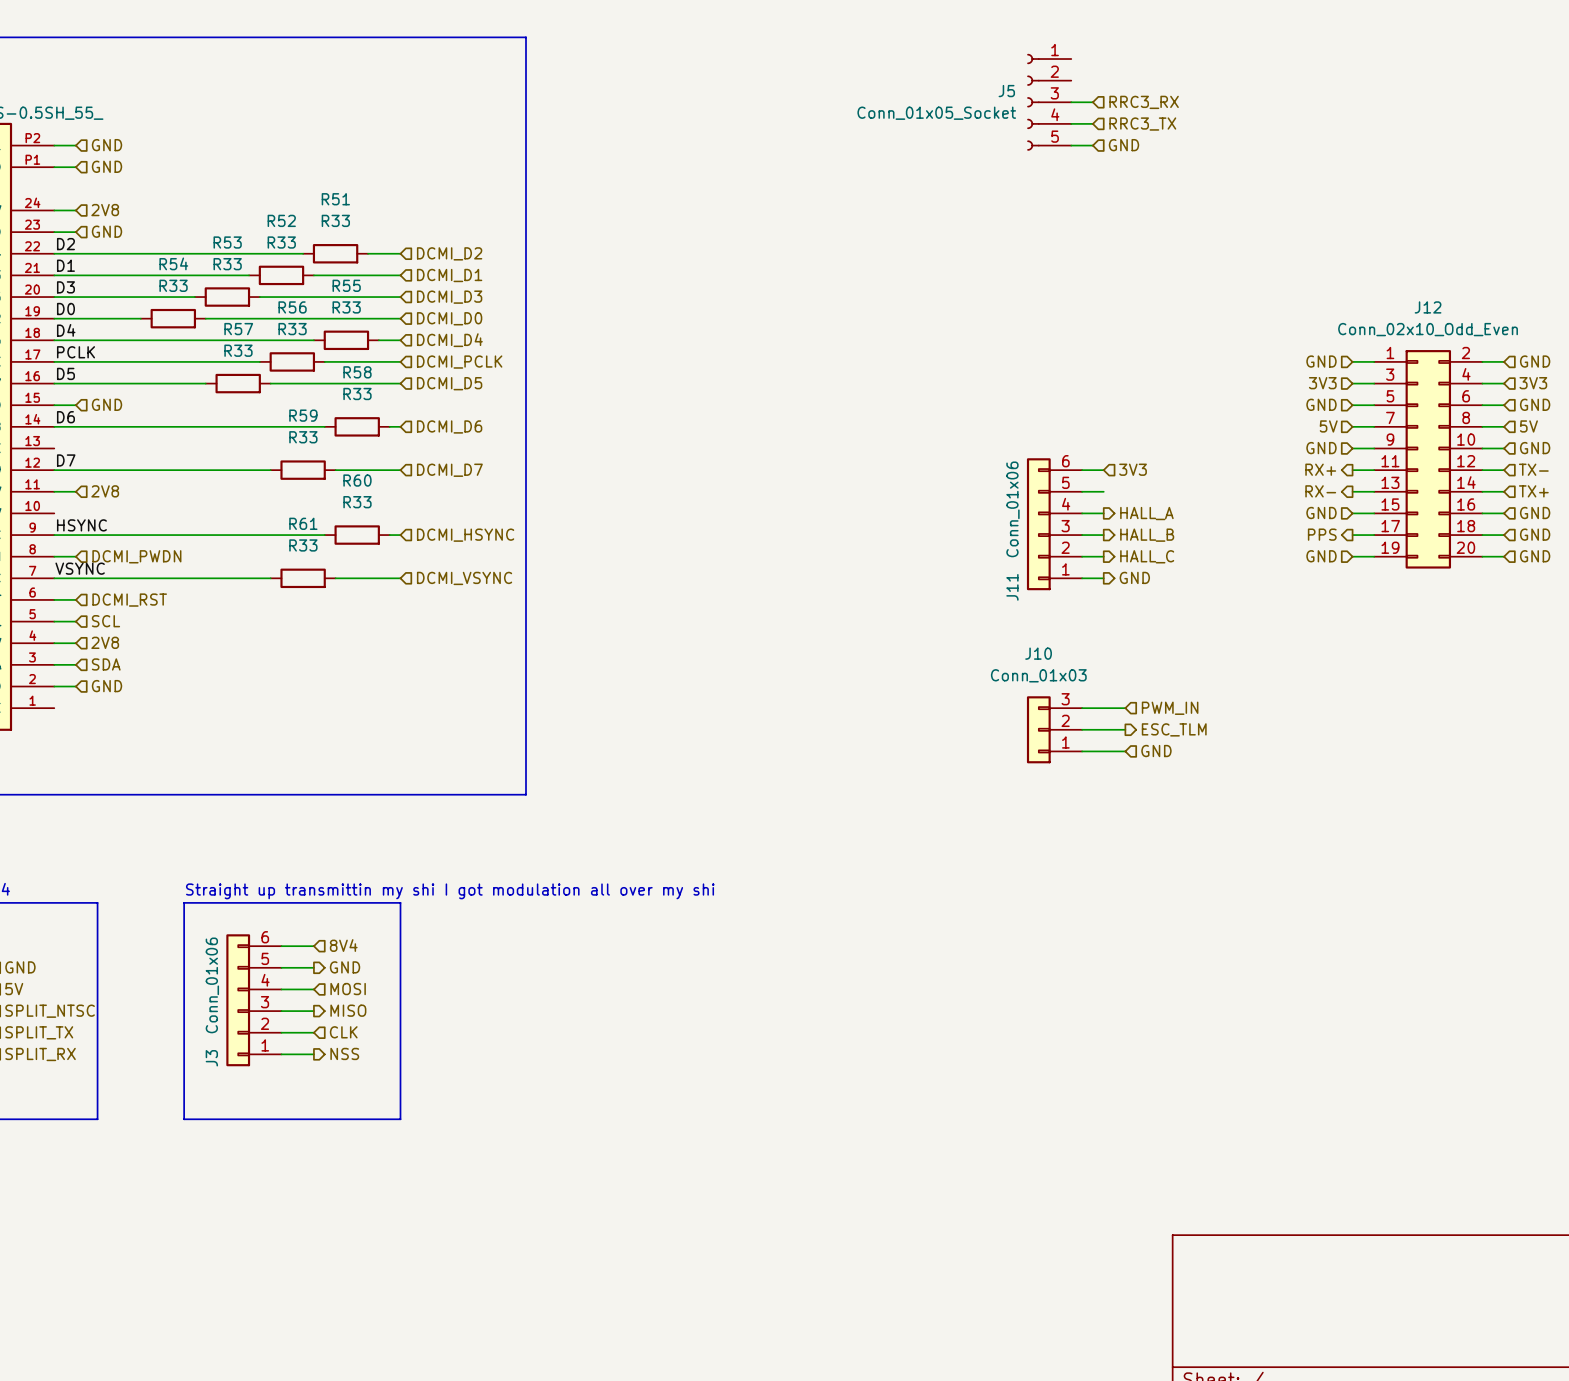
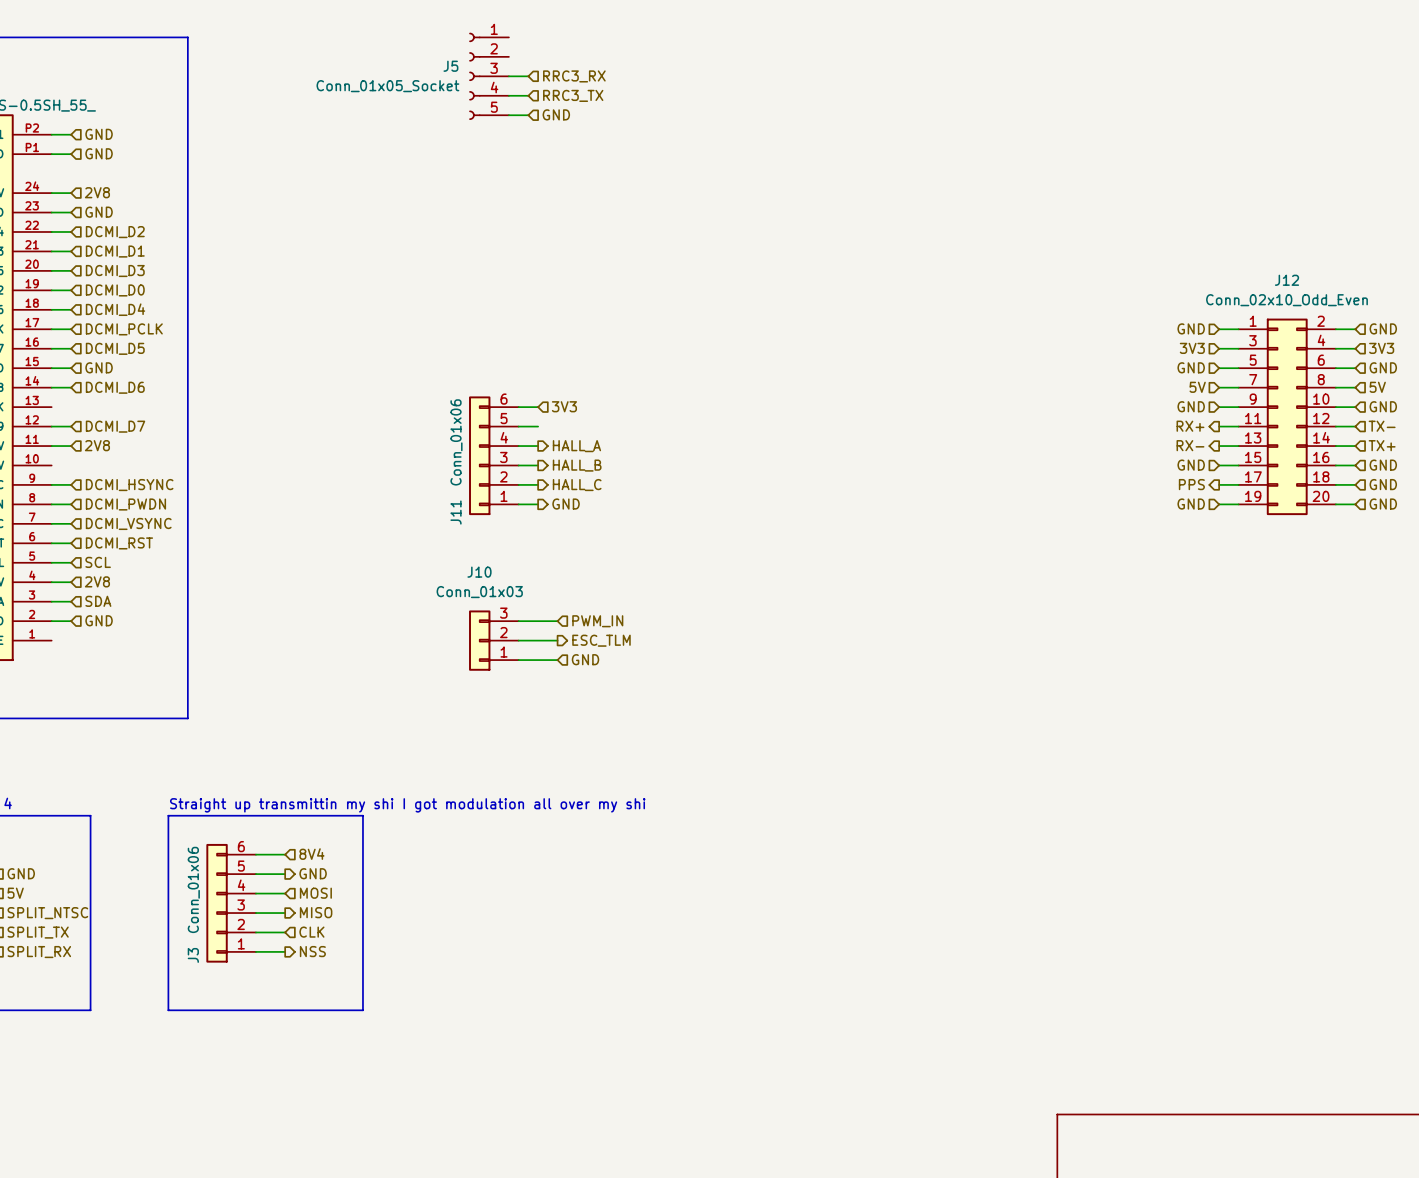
line: (205, 37) (526, 37) (526, 794) (205, 794) -> (187, 37) (187, 718)
wire: none -> (508, 76) (528, 76)
hierarchical label: none -> RRC3_RX (574, 76)
wire: none -> (508, 95) (528, 95)
hierarchical label: none -> RRC3_TX (573, 95)
J5 position: (1049, 102) -> (489, 76)
wire: (1071, 102) (1092, 102) -> none
hierarchical label: RRC3_RX (1144, 102) -> none
wire: none -> (508, 115) (528, 115)
hierarchical label: none -> GND (556, 114)
wire: (1071, 123) (1092, 123) -> none
hierarchical label: RRC3_TX (1142, 124) -> none
wire: (1071, 145) (1092, 145) -> none
hierarchical label: GND (1124, 145) -> none
label: D2 (65, 244) -> none
wire: (75, 253) (303, 253) -> none
hierarchical label: none -> DCMI_D2 (115, 232)
R51: R33 (335, 253) -> none
wire: (368, 253) (400, 253) -> none
hierarchical label: DCMI_D2 (449, 253) -> none
label: D1 (65, 265) -> none
wire: (75, 275) (249, 275) -> none
hierarchical label: none -> DCMI_D1 (115, 251)
R52: R33 (281, 275) -> none
wire: (313, 275) (400, 275) -> none
hierarchical label: DCMI_D1 (449, 275) -> none
label: D3 (65, 287) -> none
wire: (75, 297) (194, 297) -> none
hierarchical label: none -> DCMI_D3 (115, 271)
R53: R33 (227, 297) -> none
wire: (259, 297) (400, 297) -> none
hierarchical label: DCMI_D3 (449, 297) -> none
label: D0 (65, 309) -> none
wire: (75, 318) (140, 318) -> none
hierarchical label: none -> DCMI_D0 (115, 290)
R54: R33 (173, 318) -> none
wire: (205, 318) (400, 318) -> none
hierarchical label: DCMI_D0 (449, 318) -> none
label: D4 (66, 330) -> none
wire: (75, 340) (313, 340) -> none
hierarchical label: none -> DCMI_D4 (115, 309)
R55: R33 (346, 340) -> none
wire: (378, 340) (400, 340) -> none
hierarchical label: DCMI_D4 (449, 340) -> none
label: PCLK (76, 352) -> none
wire: (75, 361) (259, 361) -> none
R56: R33 (292, 361) -> none
wire: (324, 361) (400, 361) -> none
hierarchical label: none -> DCMI_PCLK (124, 329)
hierarchical label: DCMI_PCLK (459, 362) -> none
label: D5 (65, 373) -> none
wire: (75, 383) (205, 383) -> none
hierarchical label: none -> DCMI_D5 (115, 348)
R57: R33 (238, 383) -> none
wire: (270, 383) (400, 383) -> none
hierarchical label: DCMI_D5 (449, 383) -> none
label: D6 (65, 417) -> none
wire: (75, 426) (324, 426) -> none
hierarchical label: none -> DCMI_D6 (115, 387)
R58: R33 (357, 426) -> none
wire: (389, 426) (400, 426) -> none
hierarchical label: DCMI_D6 (449, 426) -> none
wire: none -> (518, 407) (538, 407)
hierarchical label: none -> 3V3 (564, 406)
label: D7 (66, 460) -> none
hierarchical label: 3V3 (1133, 469) -> none
wire: (75, 470) (270, 470) -> none
hierarchical label: none -> DCMI_D7 (115, 426)
R59: R33 (303, 470) -> none
wire: (335, 470) (400, 470) -> none
hierarchical label: DCMI_D7 (449, 470) -> none
wire: none -> (518, 426) (538, 426)
wire: (1082, 470) (1103, 470) -> none
wire: none -> (518, 446) (538, 446)
hierarchical label: none -> HALL_A (576, 446)
wire: (1082, 491) (1103, 491) -> none
wire: none -> (518, 465) (538, 465)
hierarchical label: none -> HALL_B (577, 465)
wire: (1082, 513) (1103, 513) -> none
hierarchical label: HALL_A (1146, 513) -> none
J11 position: (1054, 524) -> (493, 455)
label: HSYNC (81, 525) -> none
wire: (75, 535) (324, 535) -> none
hierarchical label: none -> DCMI_HSYNC (129, 485)
R60: R33 (357, 535) -> none
wire: (389, 535) (400, 535) -> none
hierarchical label: DCMI_HSYNC (465, 535) -> none
wire: none -> (518, 484) (538, 484)
hierarchical label: none -> HALL_C (577, 485)
wire: (1082, 535) (1103, 535) -> none
hierarchical label: HALL_B (1147, 535) -> none
wire: none -> (518, 504) (538, 504)
hierarchical label: none -> GND (566, 504)
wire: (1082, 556) (1103, 556) -> none
hierarchical label: HALL_C (1147, 556) -> none
label: VSYNC (80, 568) -> none
hierarchical label: GND (1134, 577) -> none
wire: (75, 578) (270, 578) -> none
hierarchical label: none -> DCMI_VSYNC (128, 523)
R61: R33 (303, 578) -> none
wire: (335, 578) (400, 578) -> none
hierarchical label: DCMI_VSYNC (464, 578) -> none
wire: (1082, 578) (1103, 578) -> none
wire: none -> (518, 621) (557, 621)
hierarchical label: none -> PWM_IN (597, 621)
wire: none -> (518, 640) (557, 640)
hierarchical label: none -> ESC_TLM (601, 640)
wire: (1082, 708) (1125, 708) -> none
hierarchical label: PWM_IN (1170, 708) -> none
wire: none -> (518, 660) (557, 660)
hierarchical label: none -> GND (585, 659)
J10 position: (1054, 729) -> (493, 640)
wire: (1082, 729) (1125, 729) -> none
hierarchical label: ESC_TLM (1174, 729) -> none
wire: (1082, 751) (1125, 751) -> none
hierarchical label: GND (1156, 751) -> none

